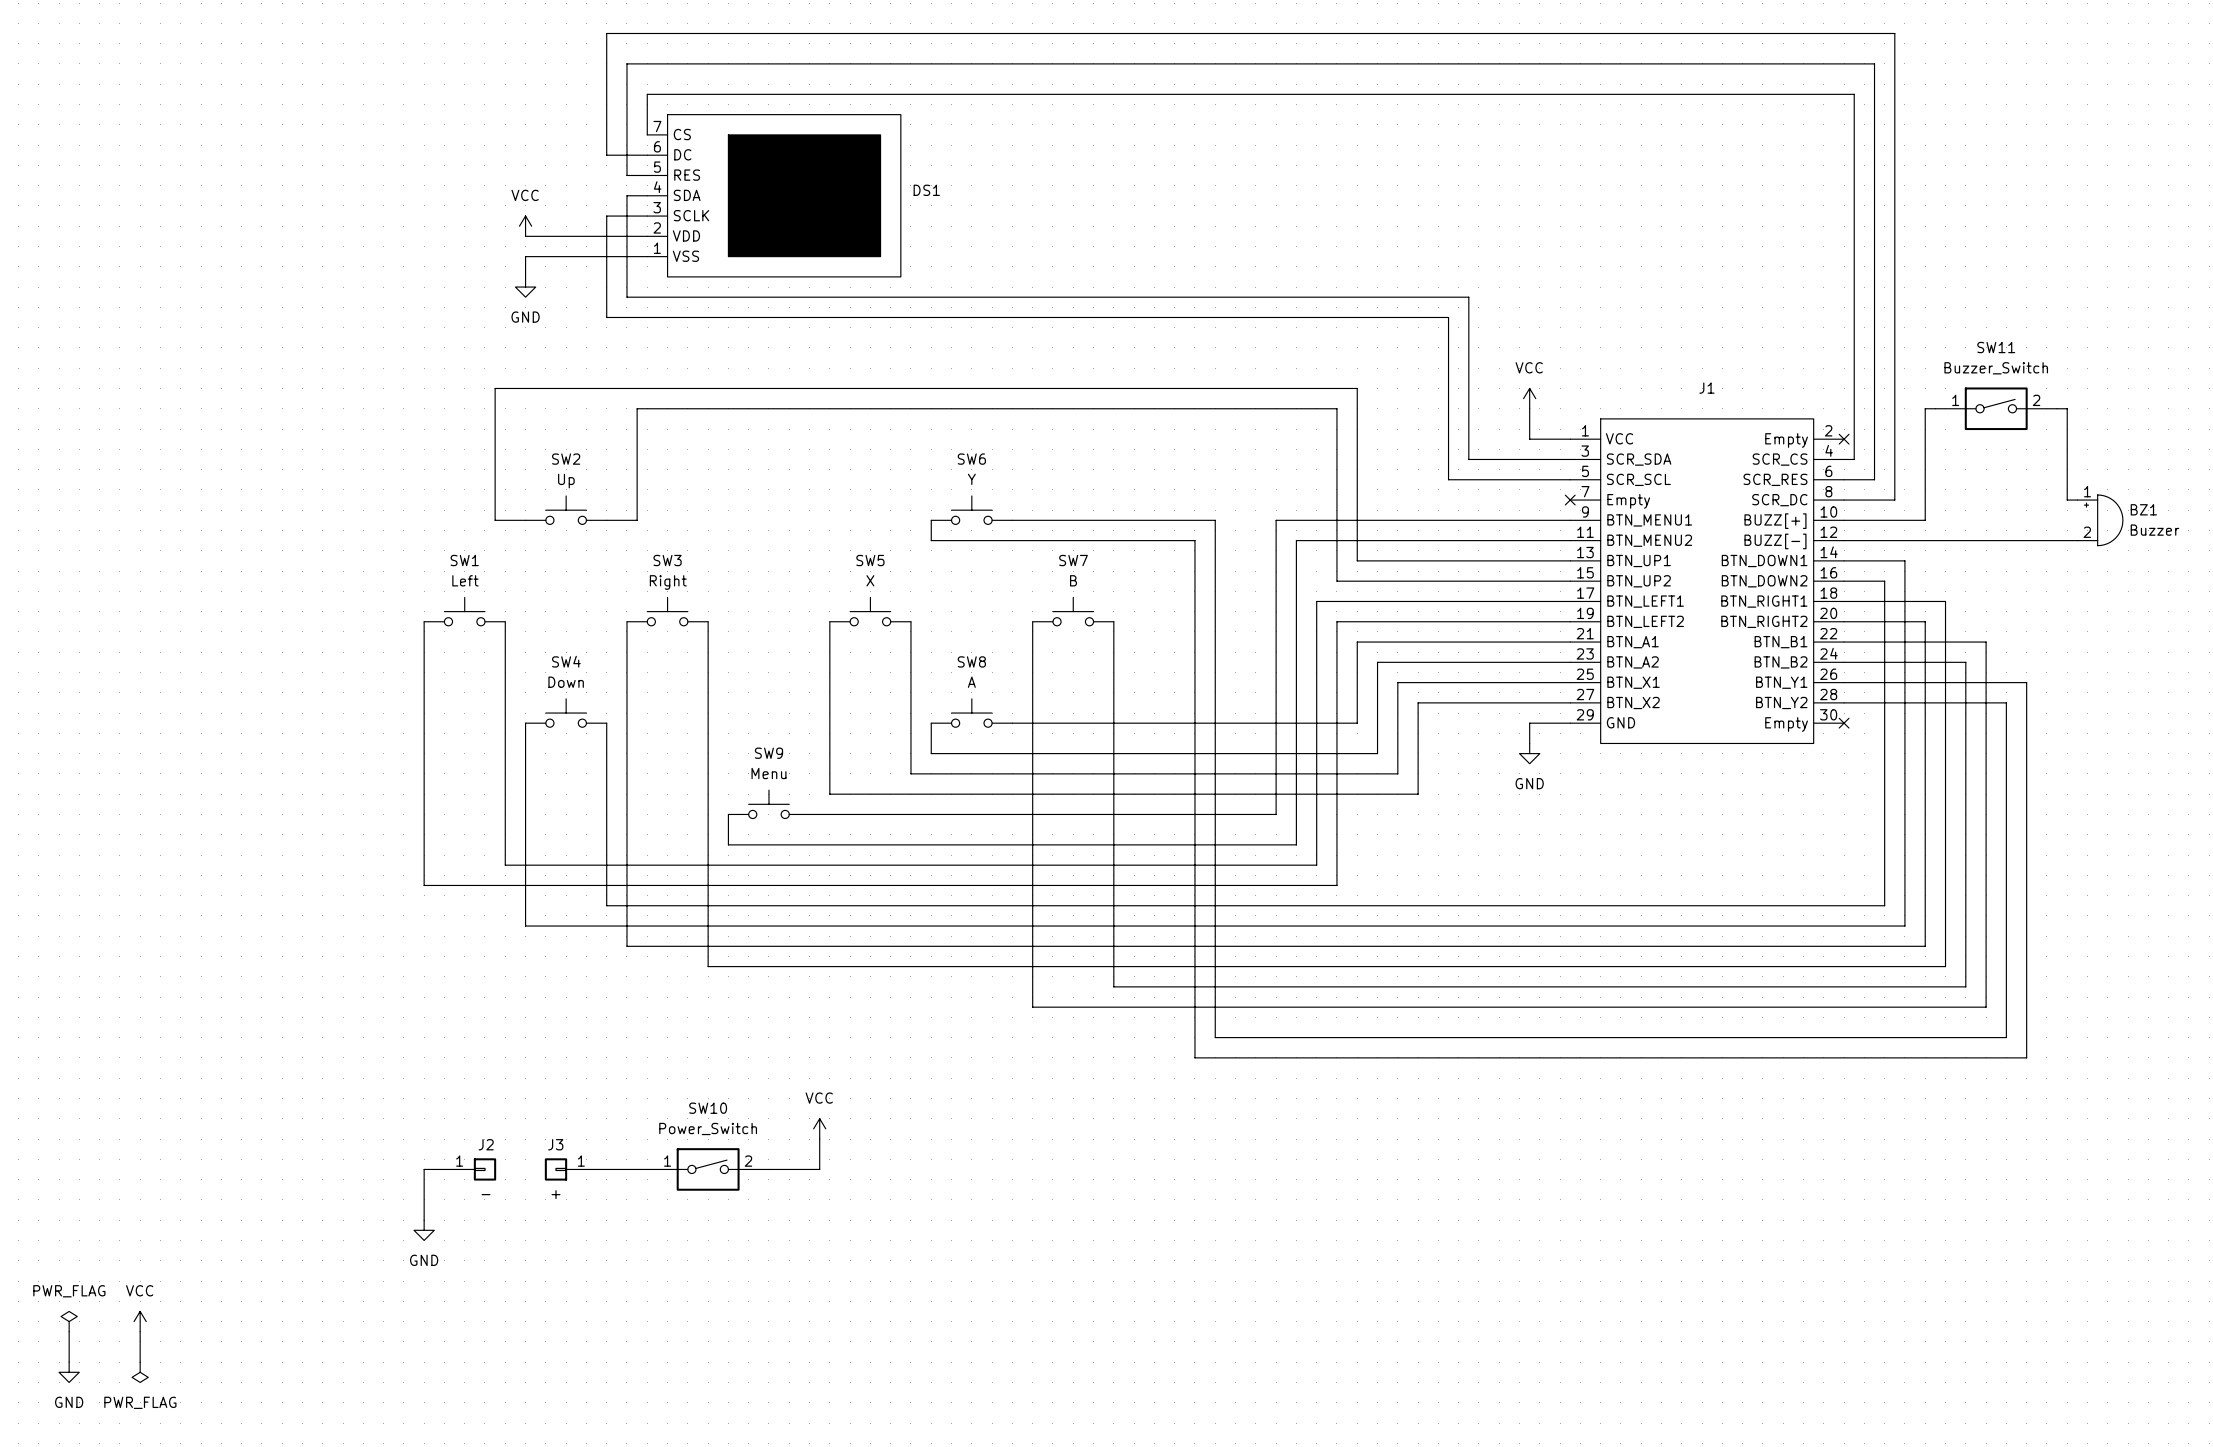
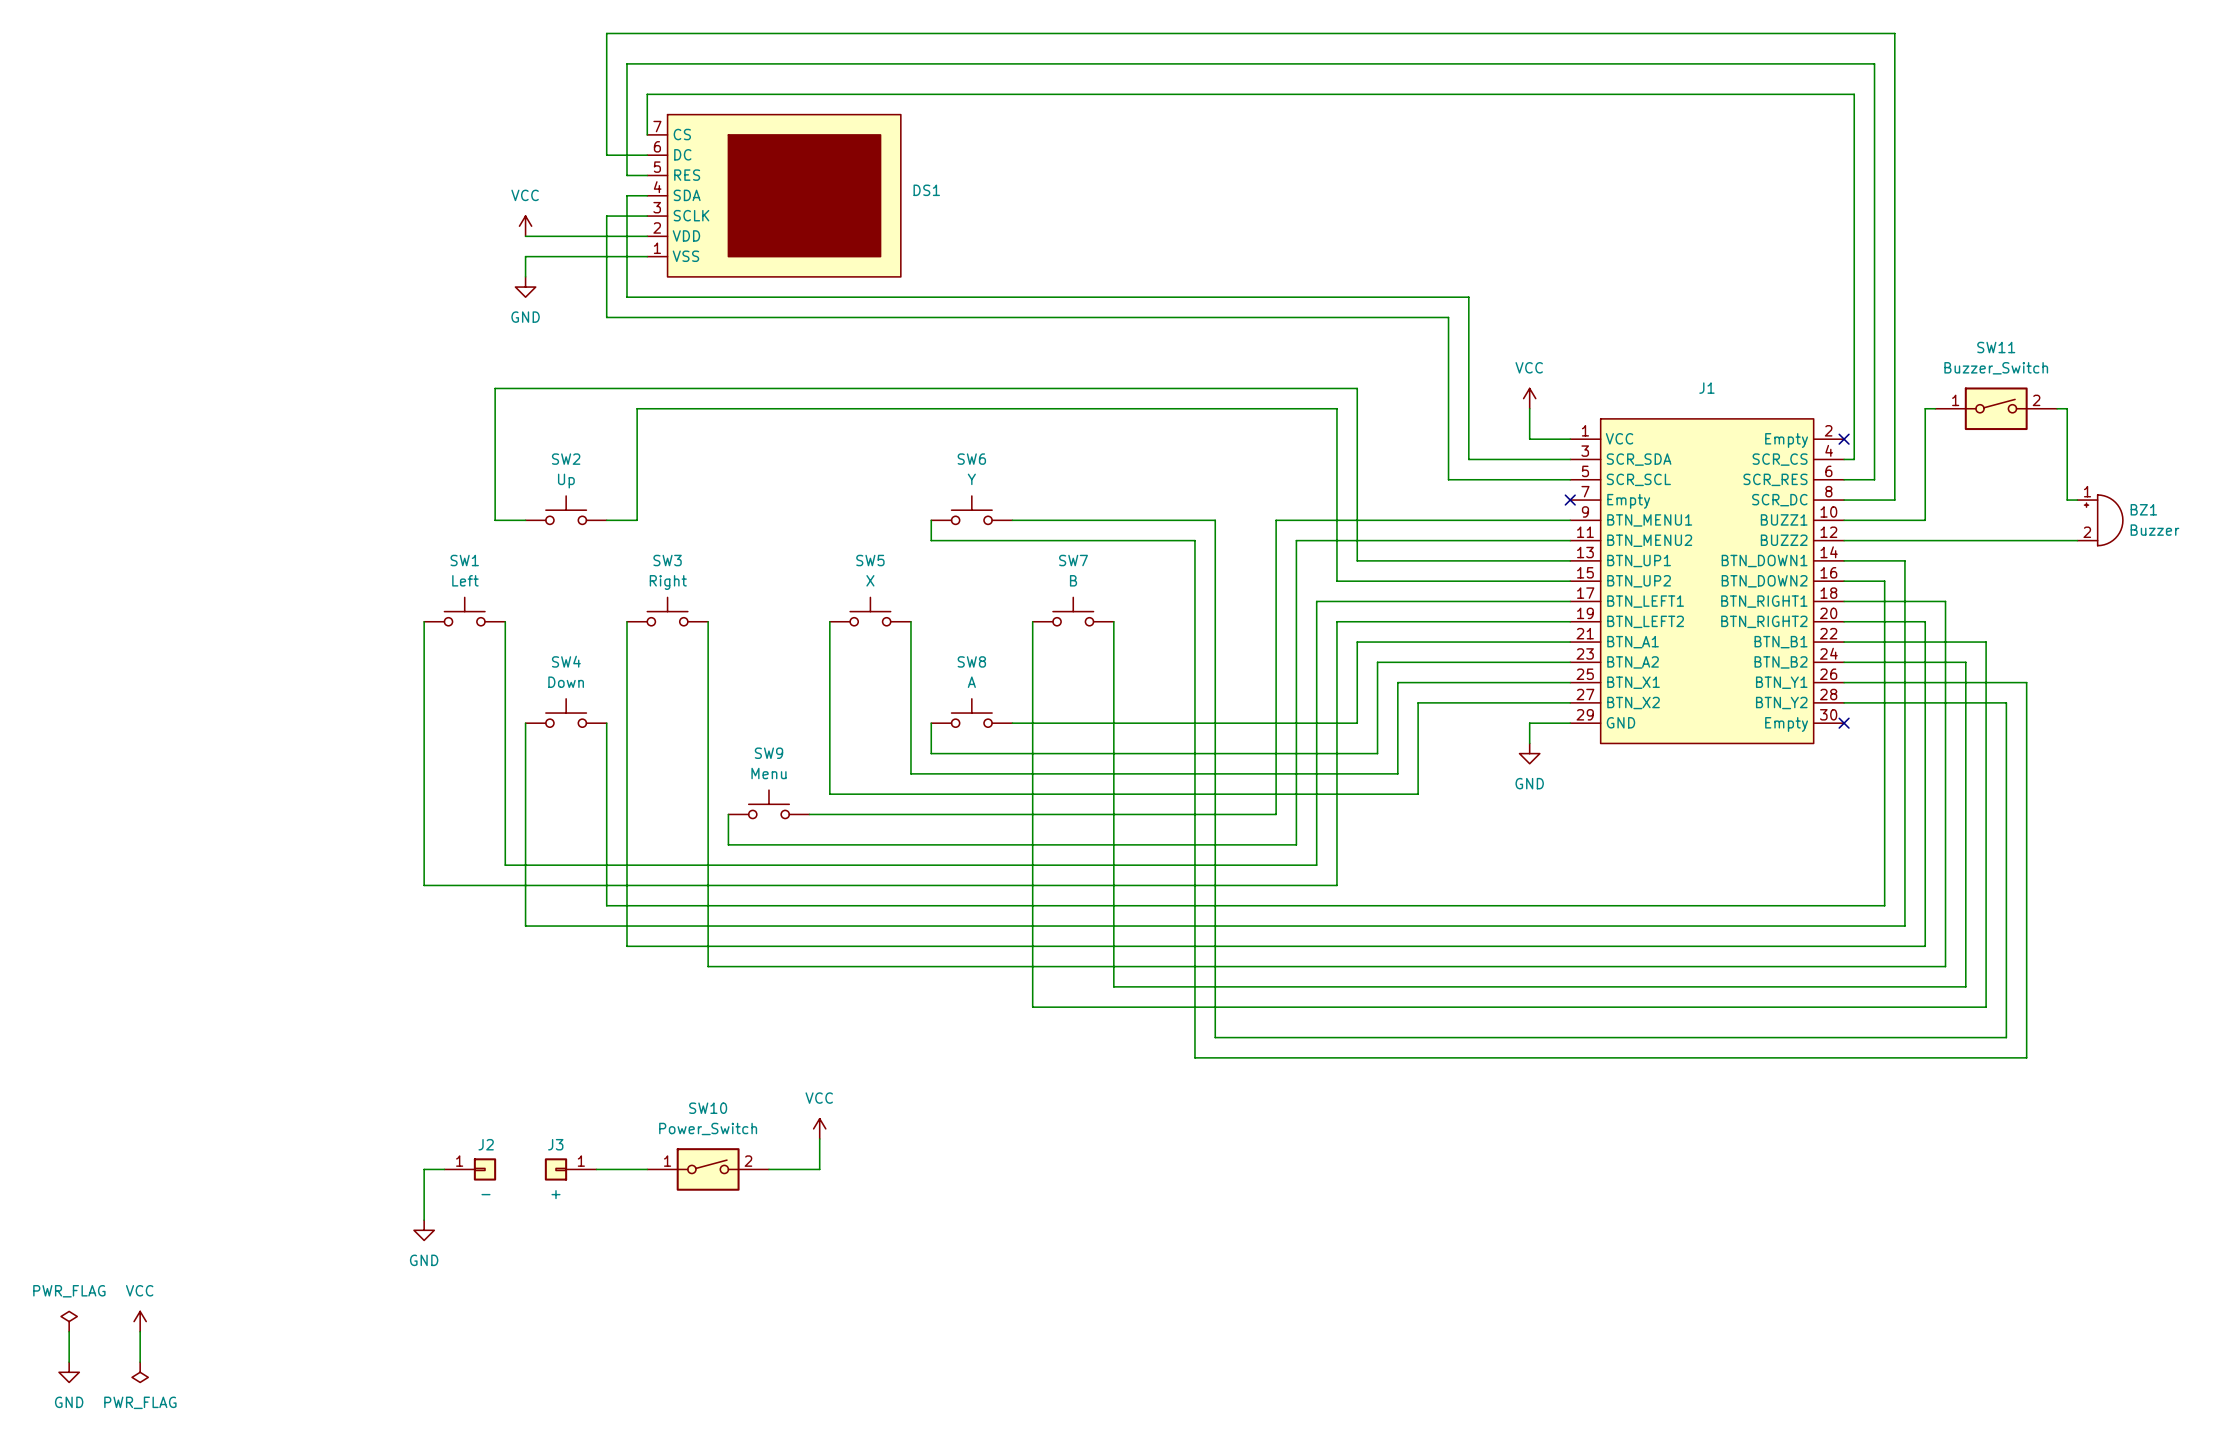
J1 pin name: BUZZ[+] (1775, 521) -> BUZZ1 (1784, 519)
J1 pin name: BUZZ[-] (1775, 541) -> BUZZ2 (1784, 540)

